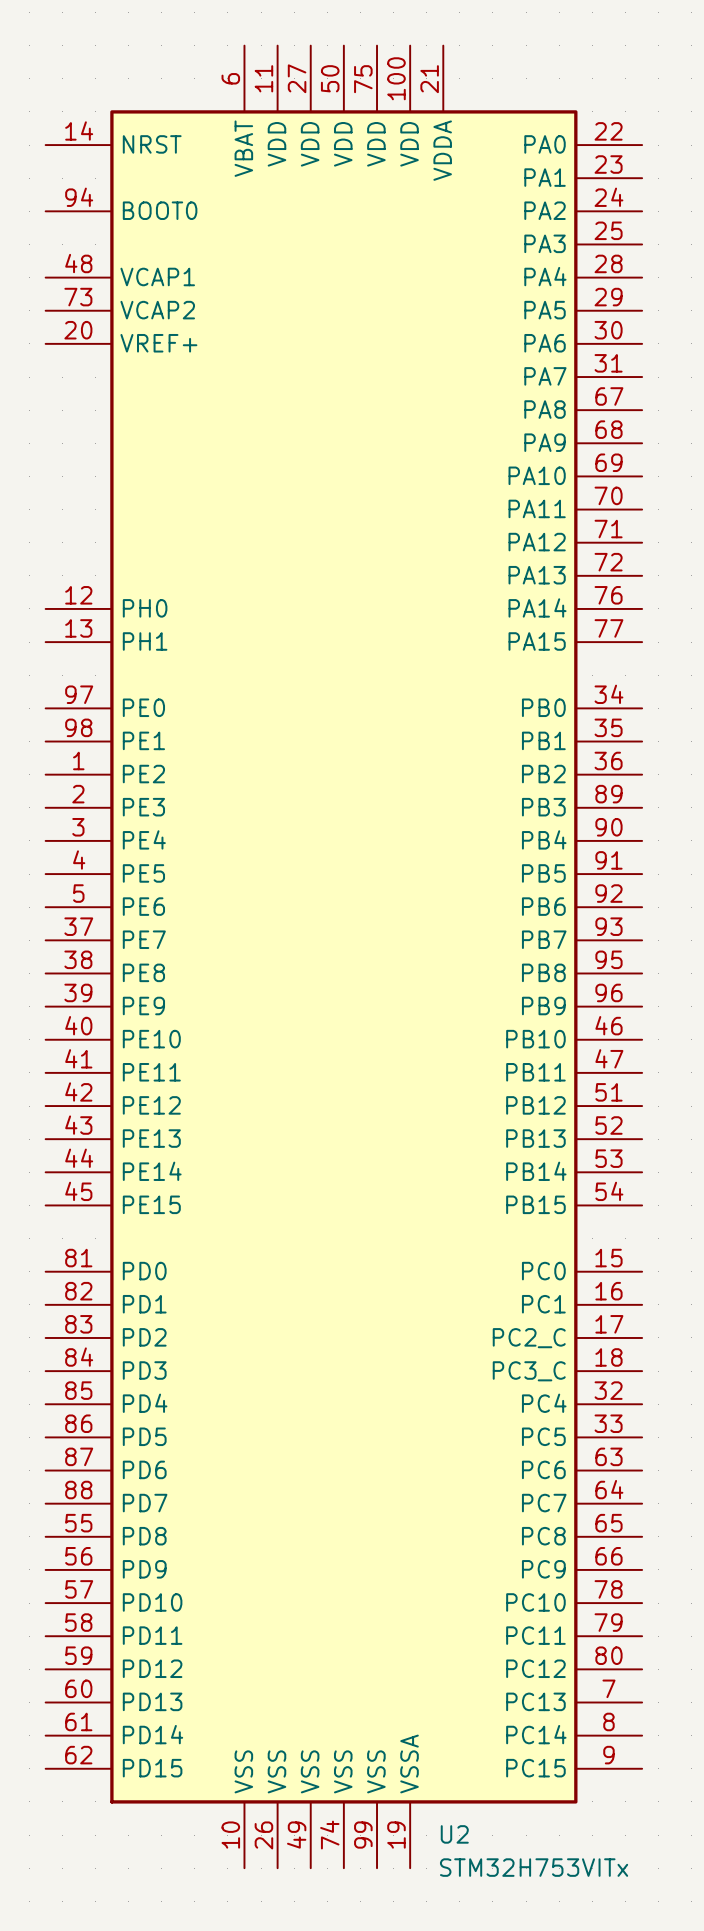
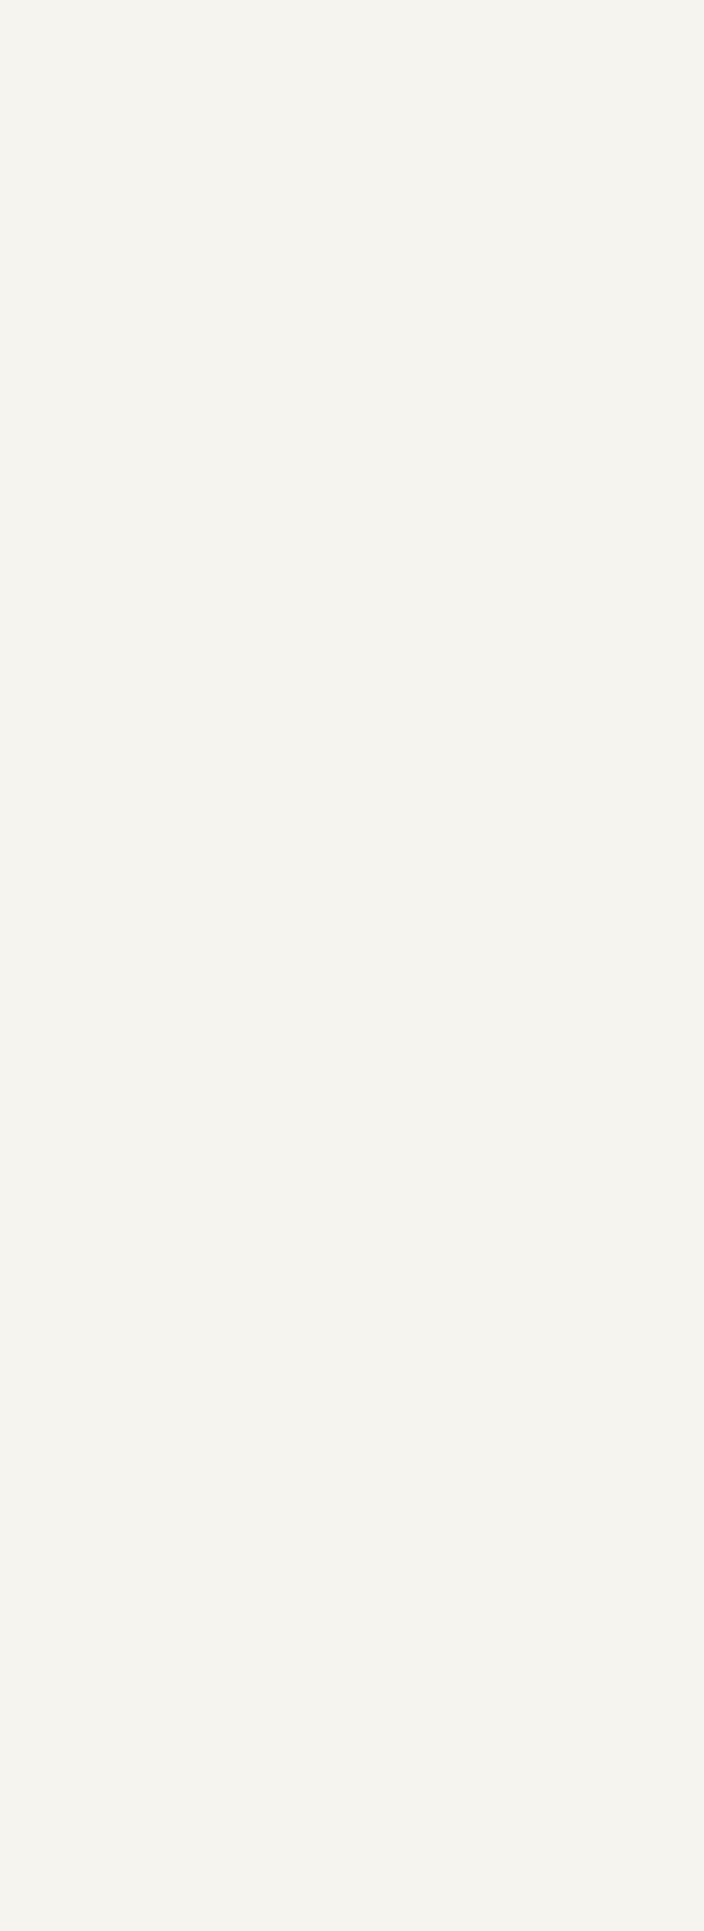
U2: STM32H753VITx (343, 956) -> none

